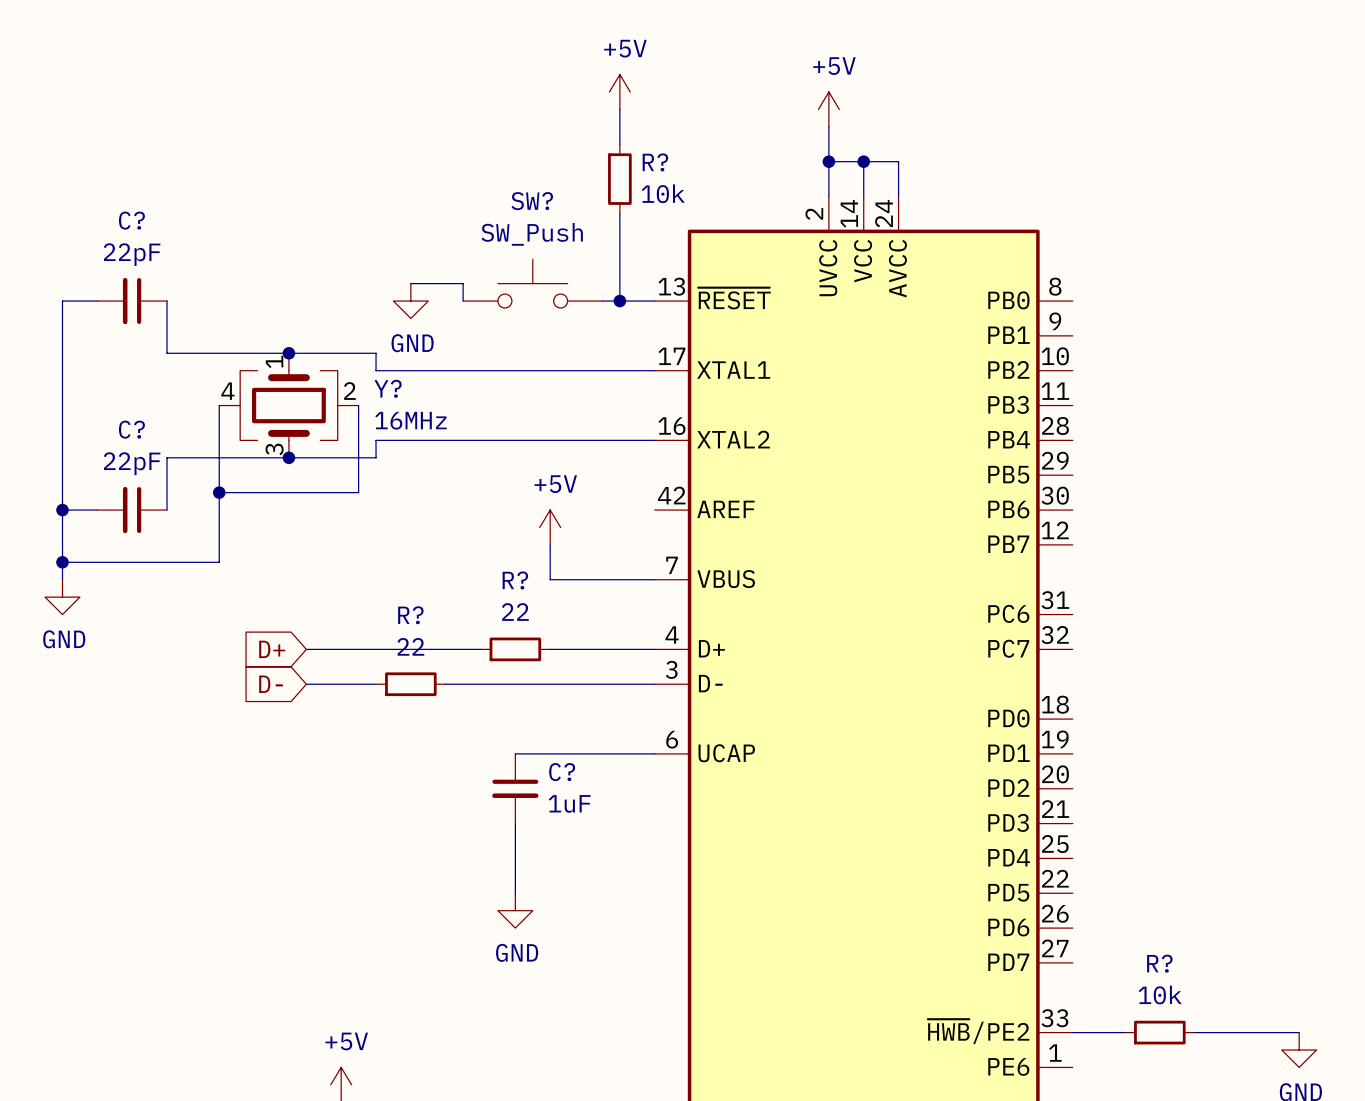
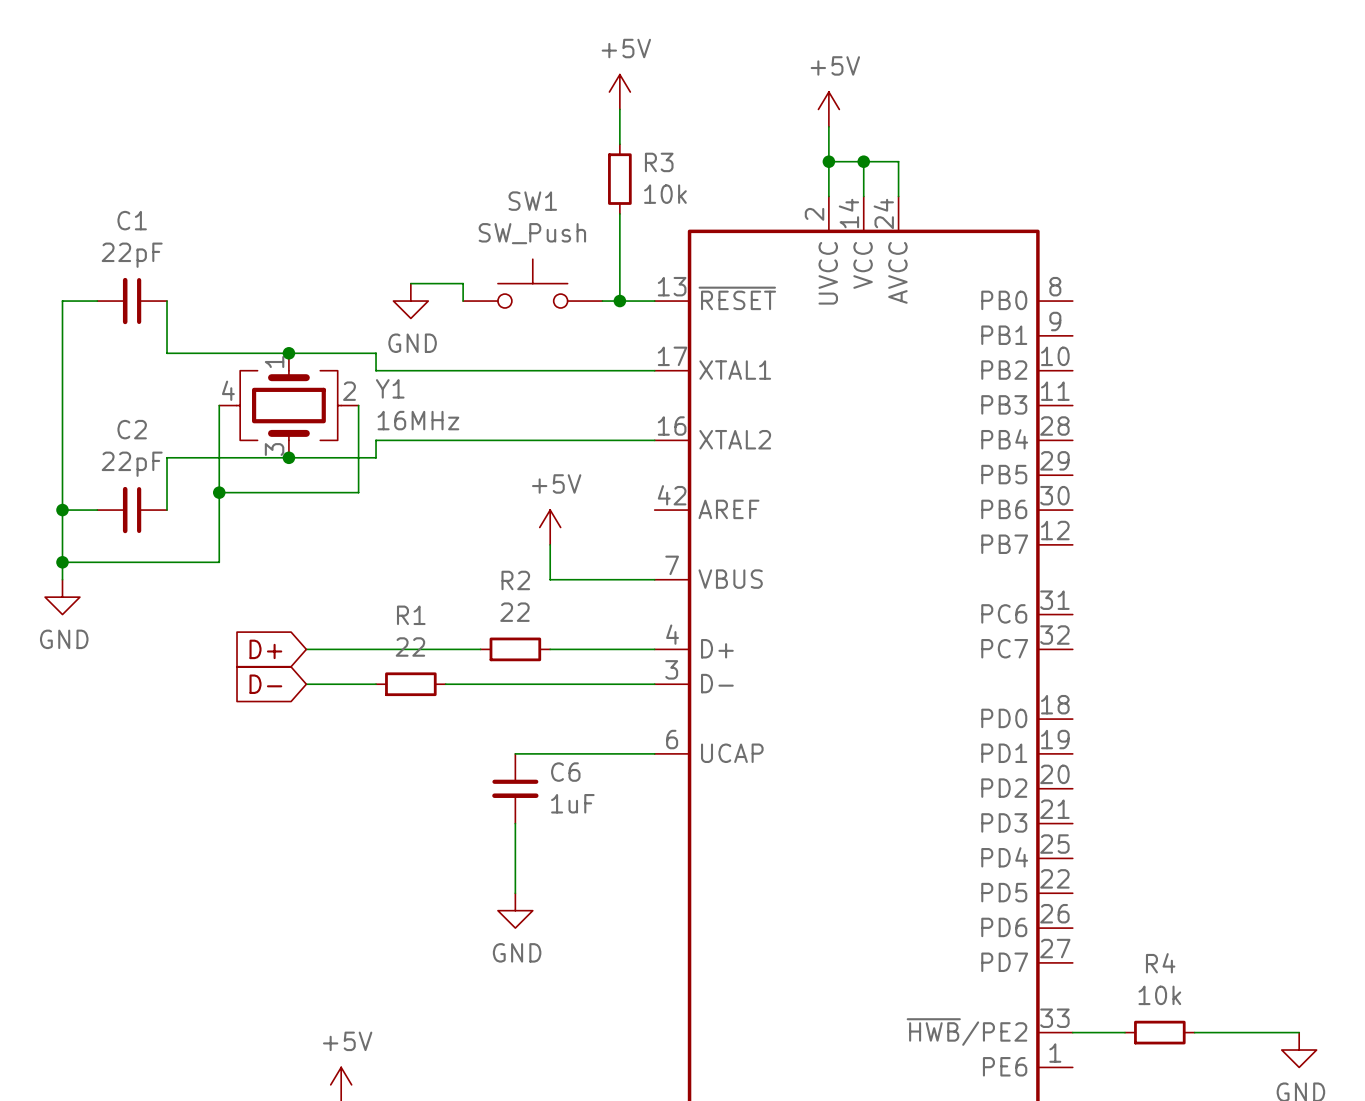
R? name: R? (655, 162) -> R3 (659, 162)
SW? name: SW? (532, 201) -> SW1 (532, 201)
C? name: C? (131, 220) -> C1 (132, 220)
Y? name: Y? (387, 388) -> Y1 (390, 388)
C? name: C? (131, 429) -> C2 (132, 429)
R? name: R? (515, 580) -> R2 (515, 580)
R? name: R? (410, 615) -> R1 (411, 615)
C? name: C? (562, 772) -> C6 (565, 772)
R? name: R? (1159, 963) -> R4 (1160, 963)

